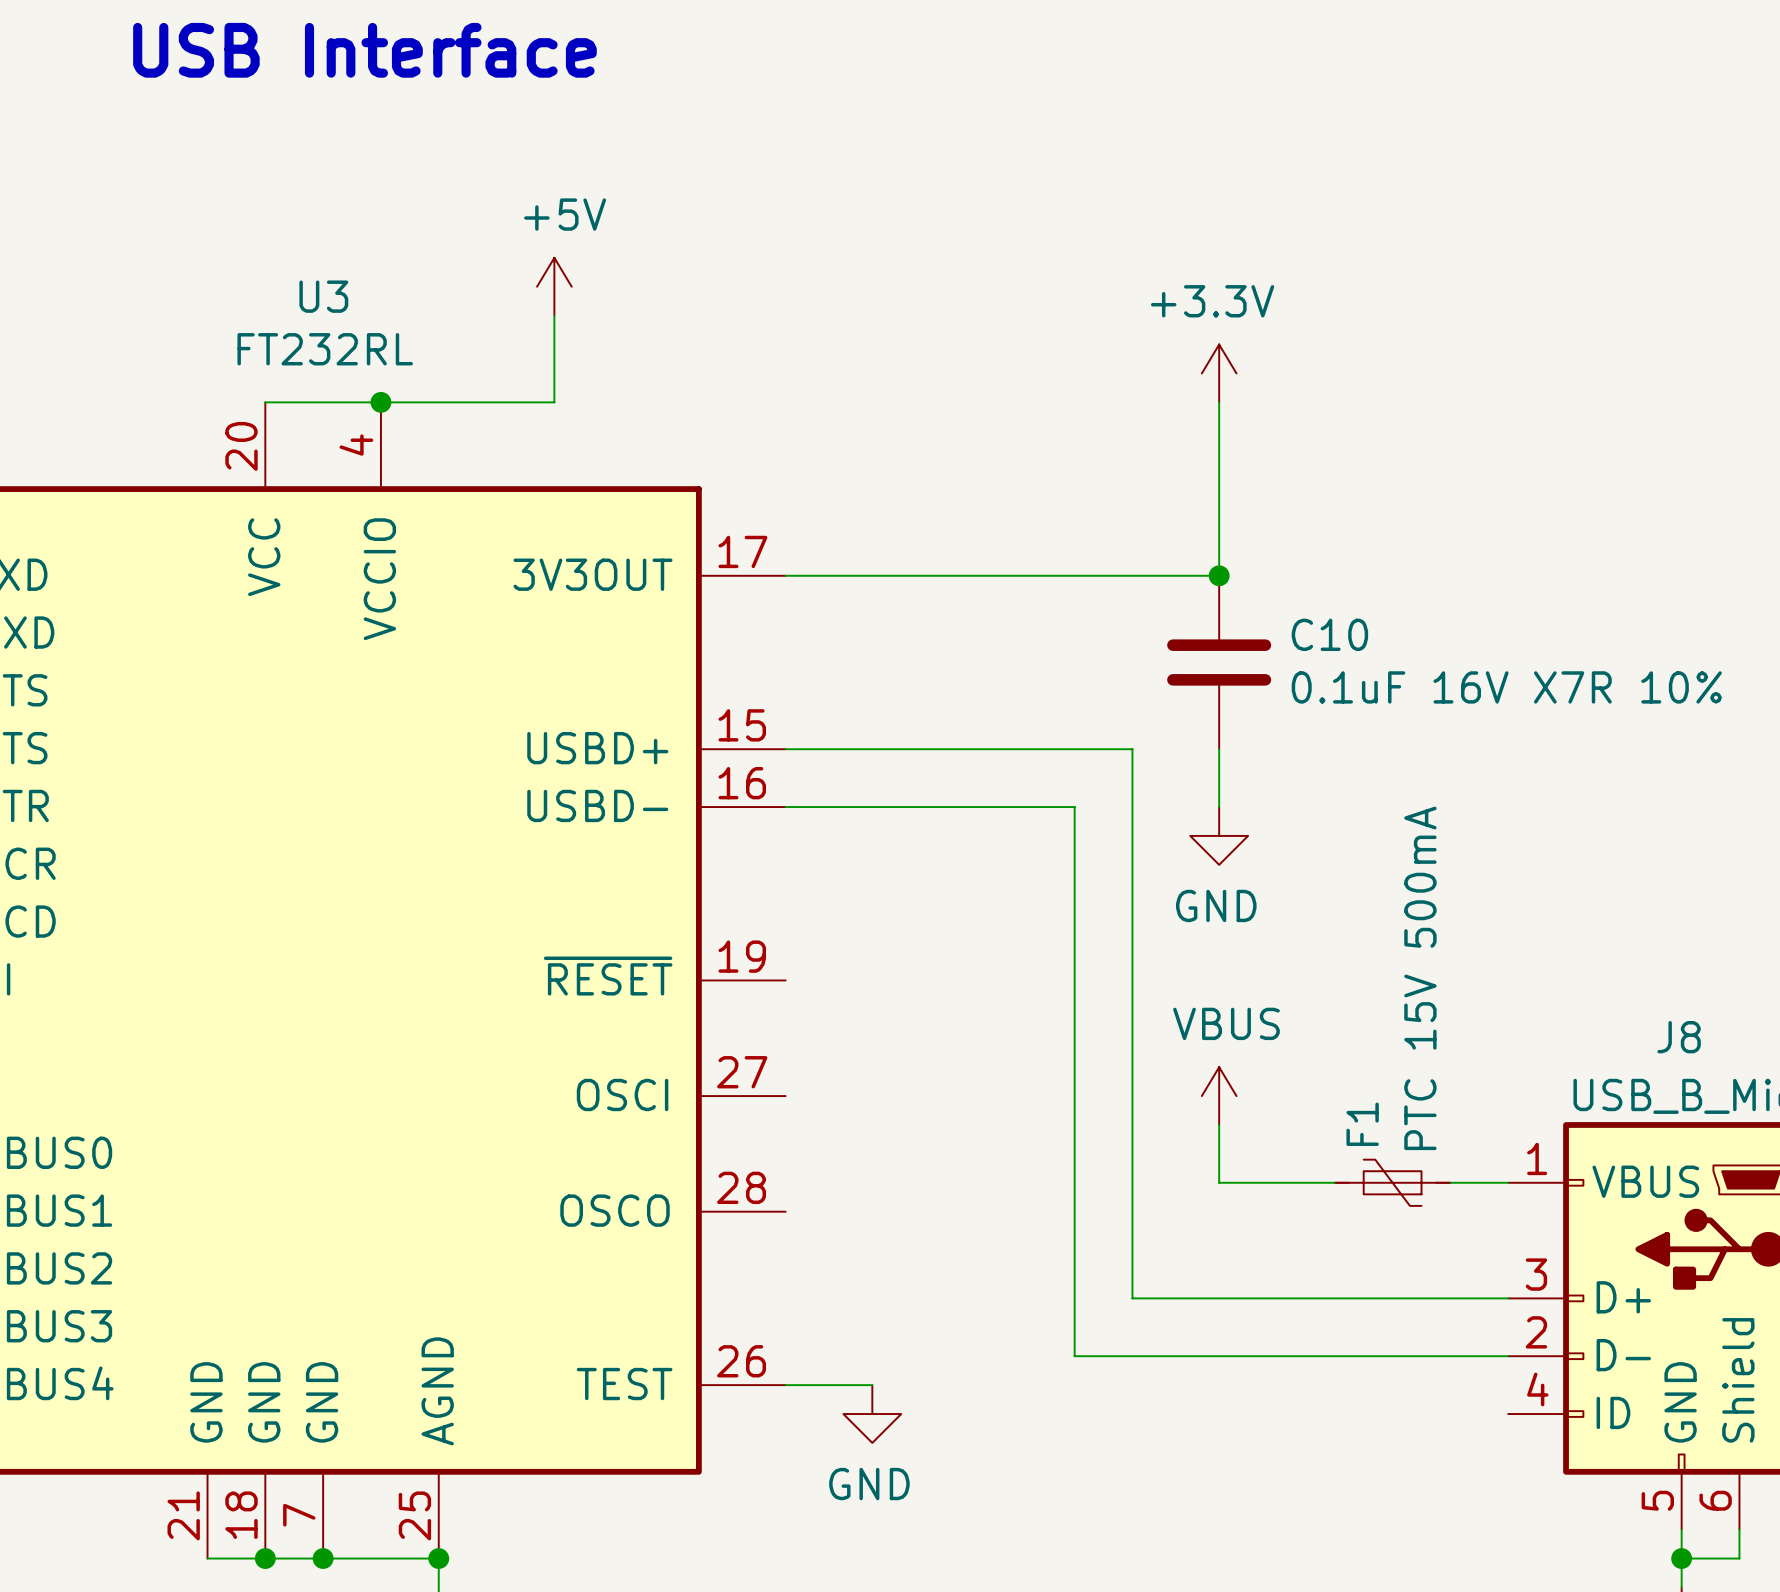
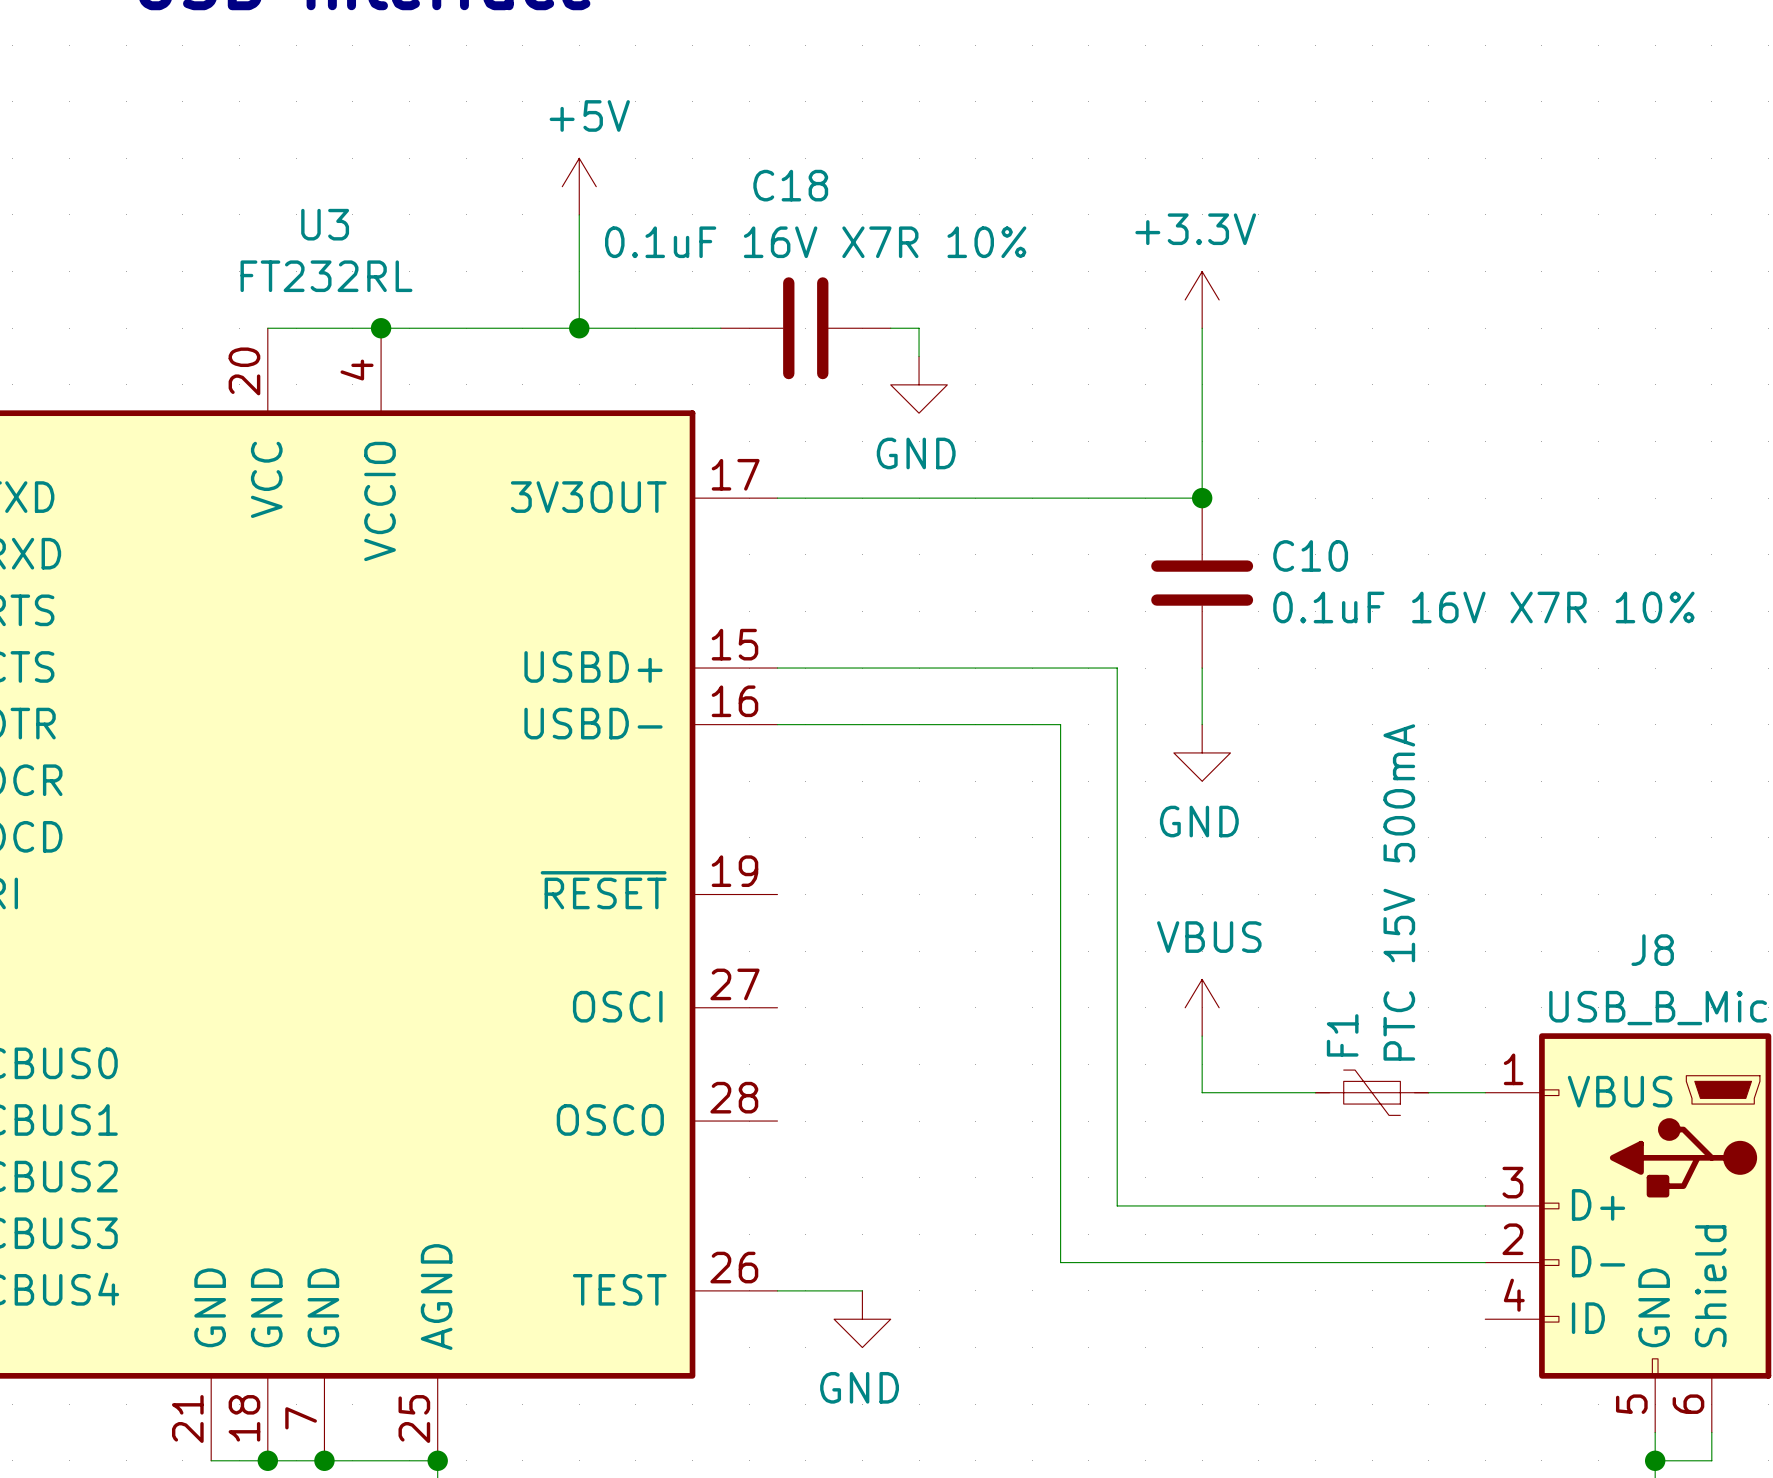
power symbol position: +5V (554, 286) -> +5V (579, 186)
wire: none -> (579, 214) (579, 328)
wire: (554, 315) (554, 402) -> (720, 328) (550, 328)
junction: none -> (579, 328)
C18: none -> 0.1uF 16V X7R 10% (805, 328)
wire: none -> (890, 328) (919, 328) (919, 356)
power symbol: none -> GND (919, 384)

